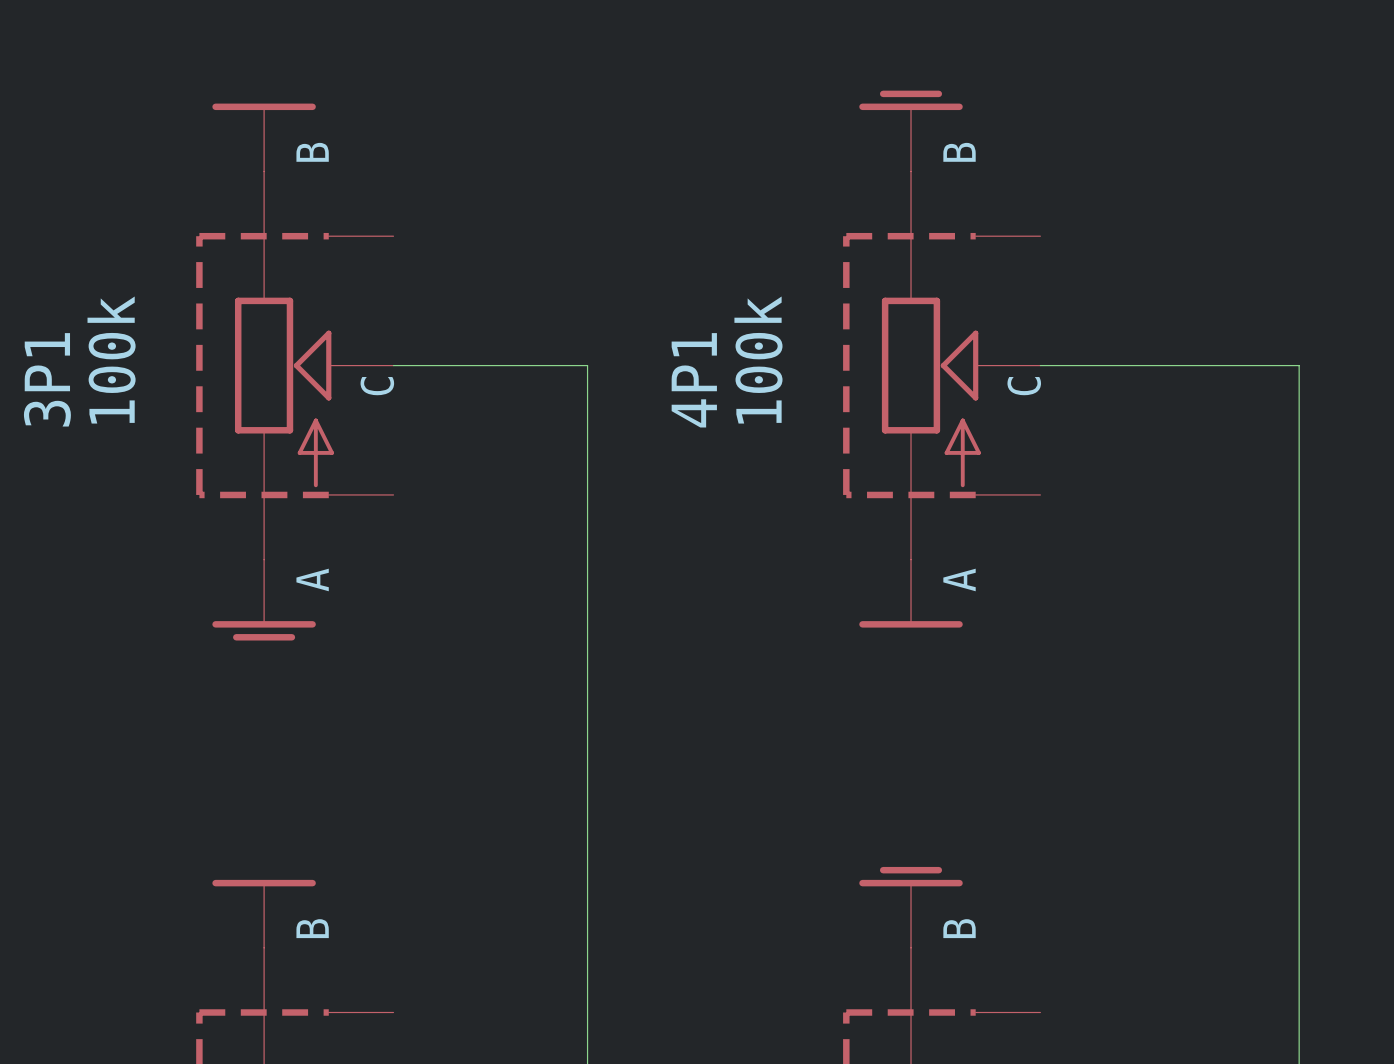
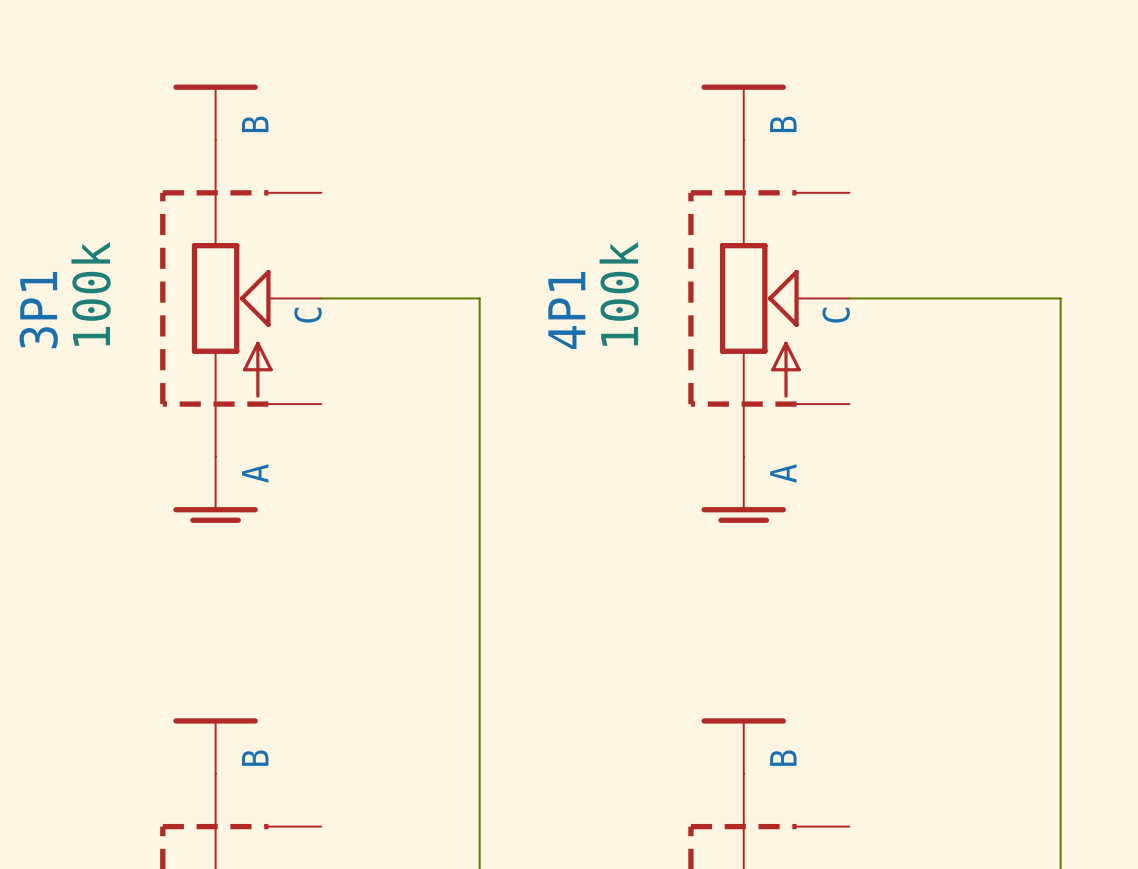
power symbol shape: [859, 90, 963, 172] -> [701, 84, 786, 141]
power symbol shape: [859, 559, 963, 628] -> [701, 456, 786, 523]
power symbol shape: [859, 866, 963, 948] -> [701, 718, 786, 774]

